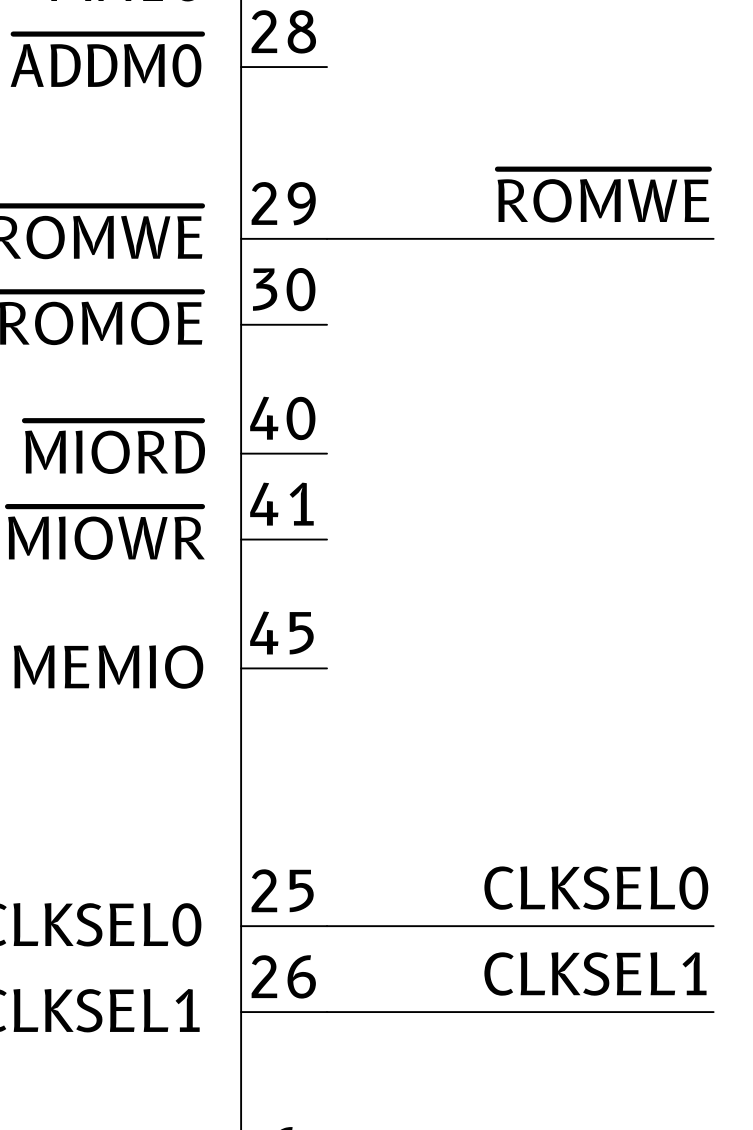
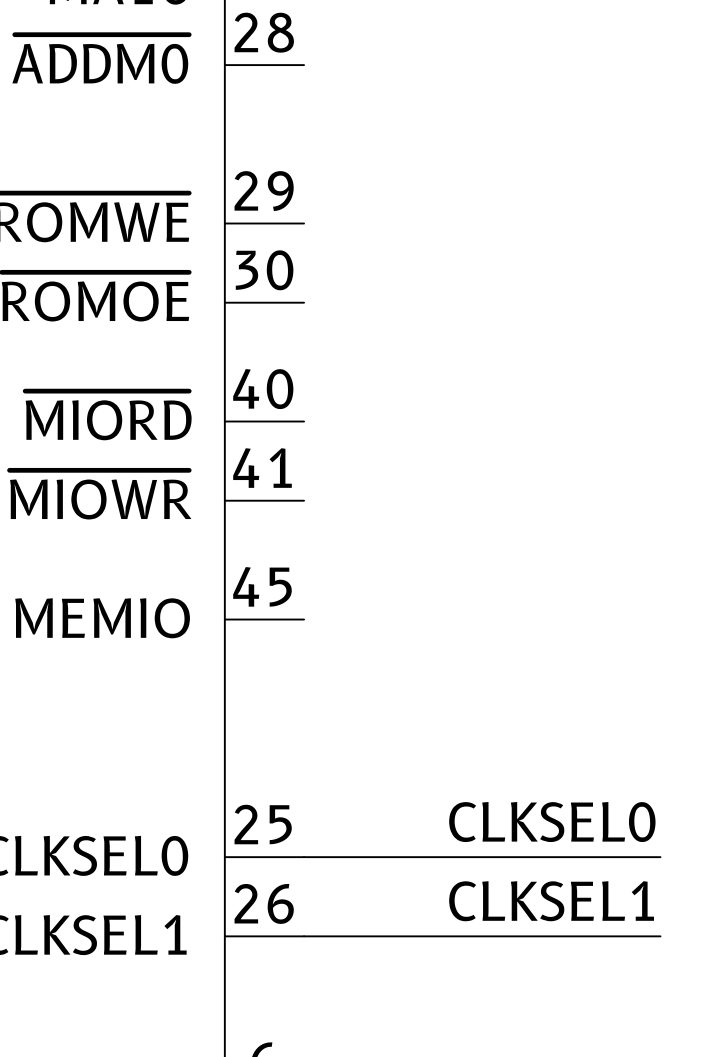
label: ~{ROMWE} (603, 195) -> none
wire: (327, 238) (713, 238) -> none

